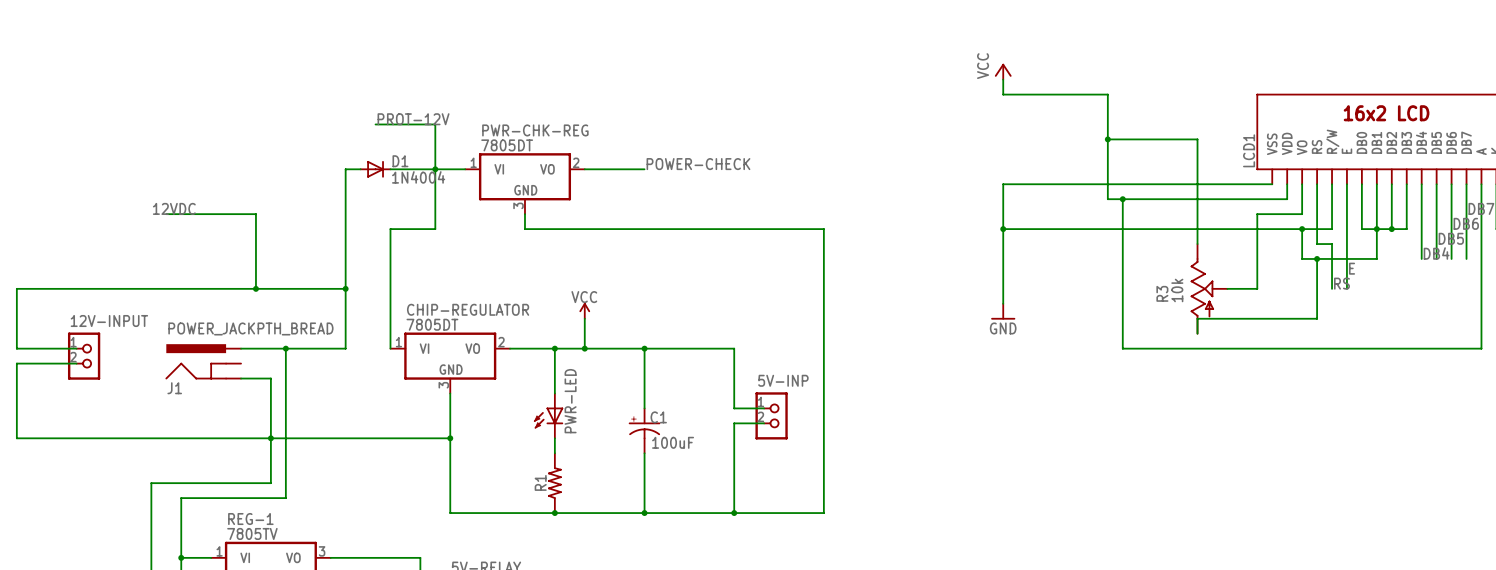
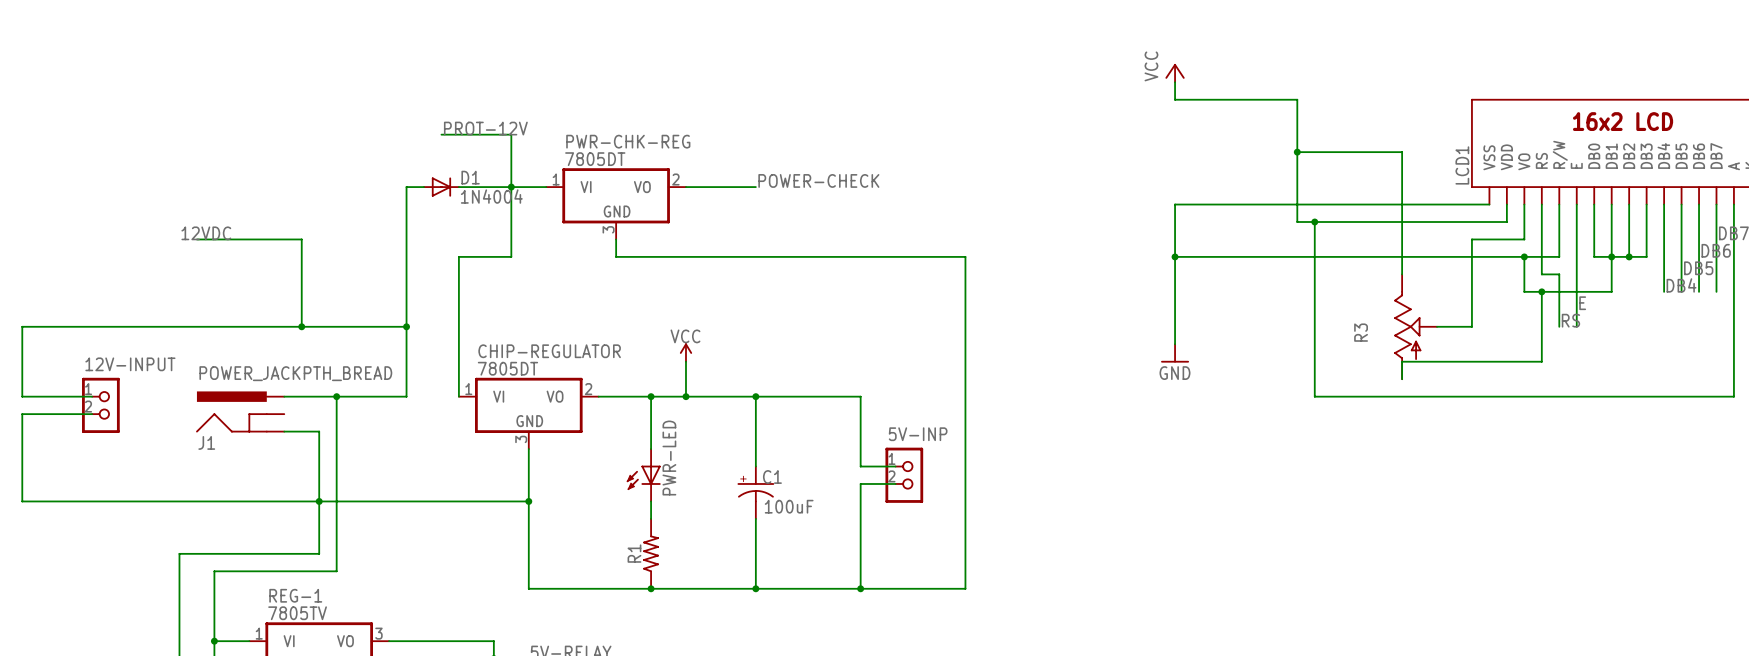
R3 value: 10k (1177, 290) -> none

